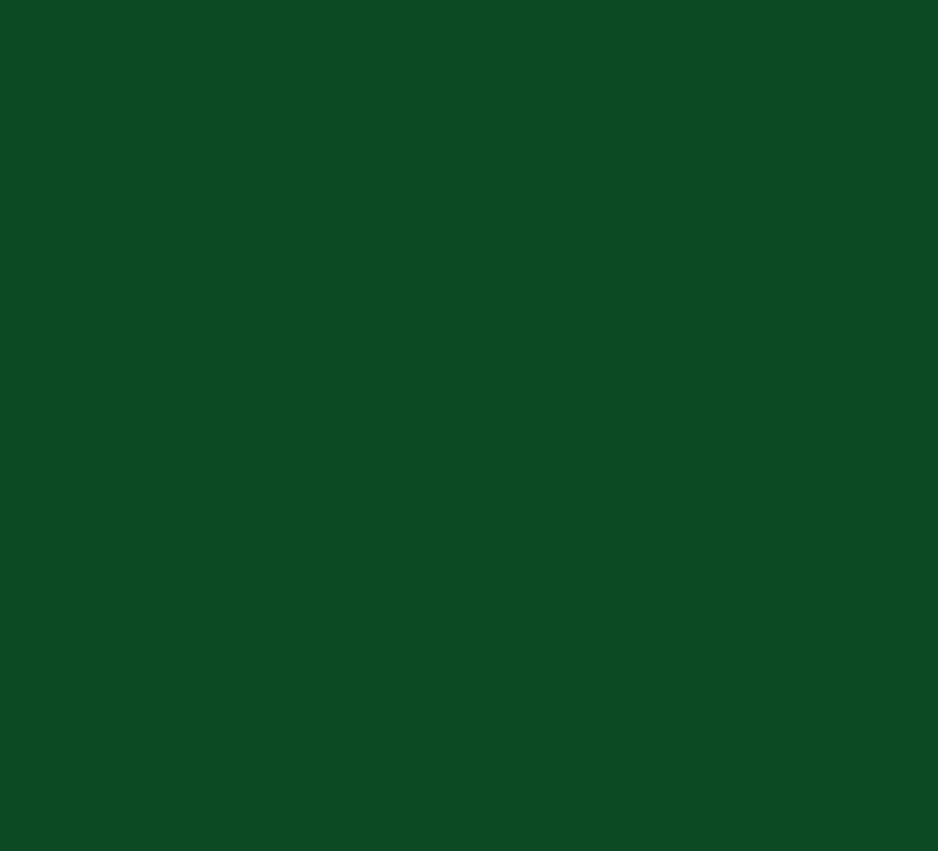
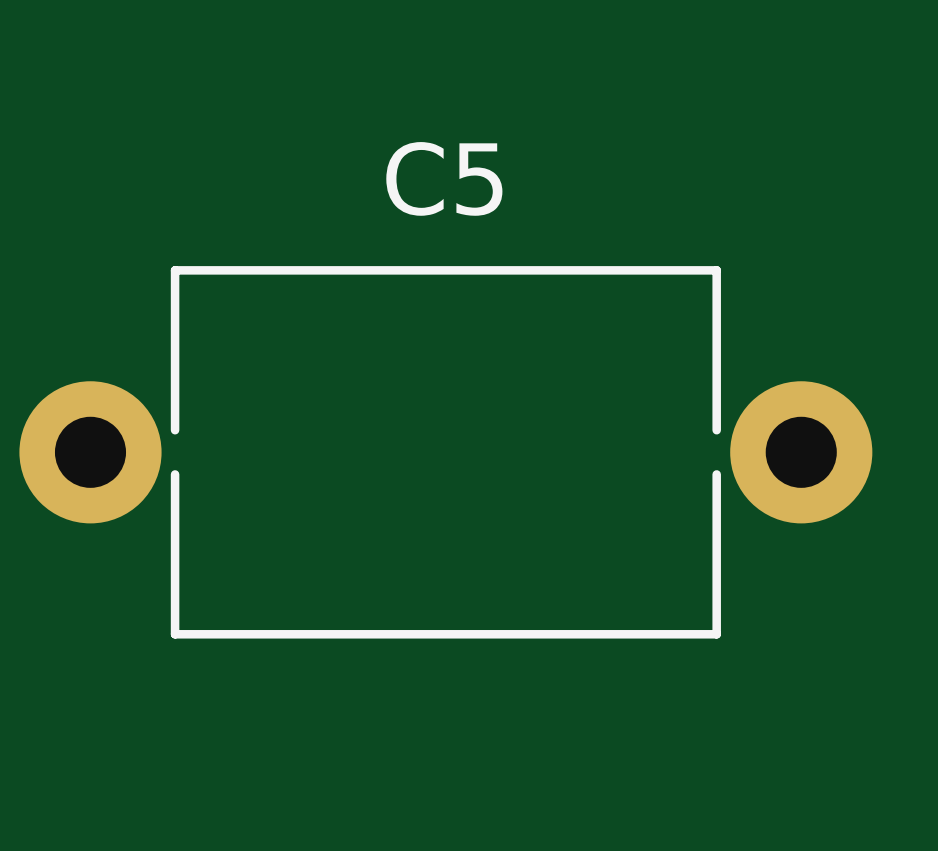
C5: none -> (445, 452)

